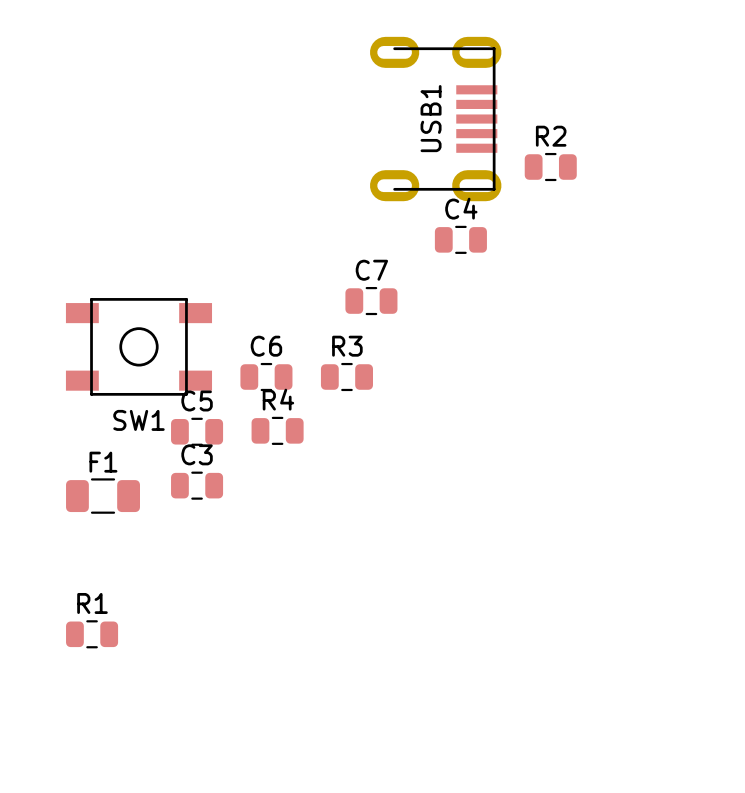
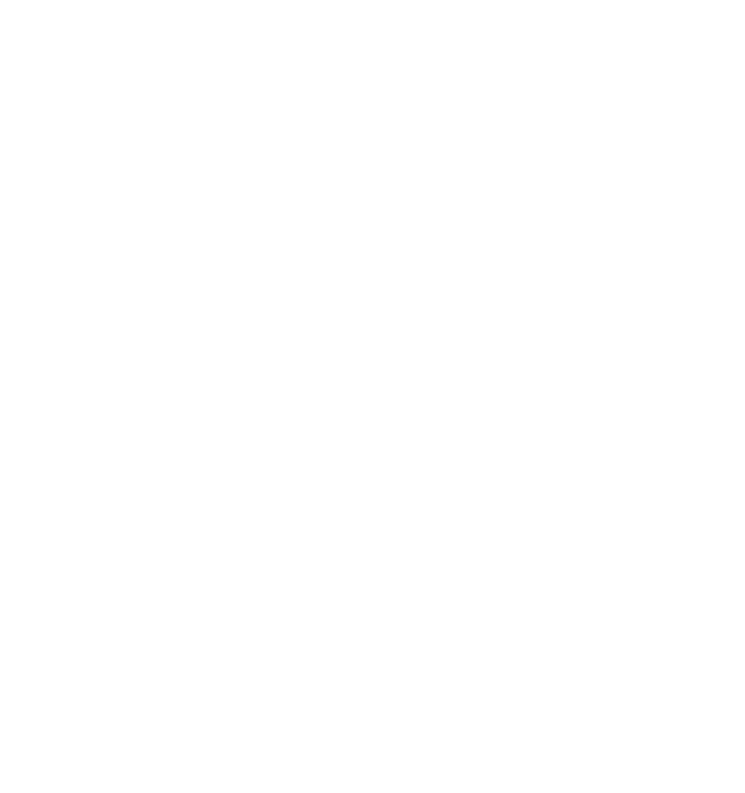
USB1: (435, 119) -> none
R2: (550, 167) -> none
C4: (460, 239) -> none
C7: (371, 301) -> none
SW1: (138, 346) -> none
C6: (266, 377) -> none
R3: (346, 377) -> none
R4: (277, 430) -> none
C5: (197, 431) -> none
C3: (197, 485) -> none
F1: (103, 496) -> none
R1: (92, 634) -> none

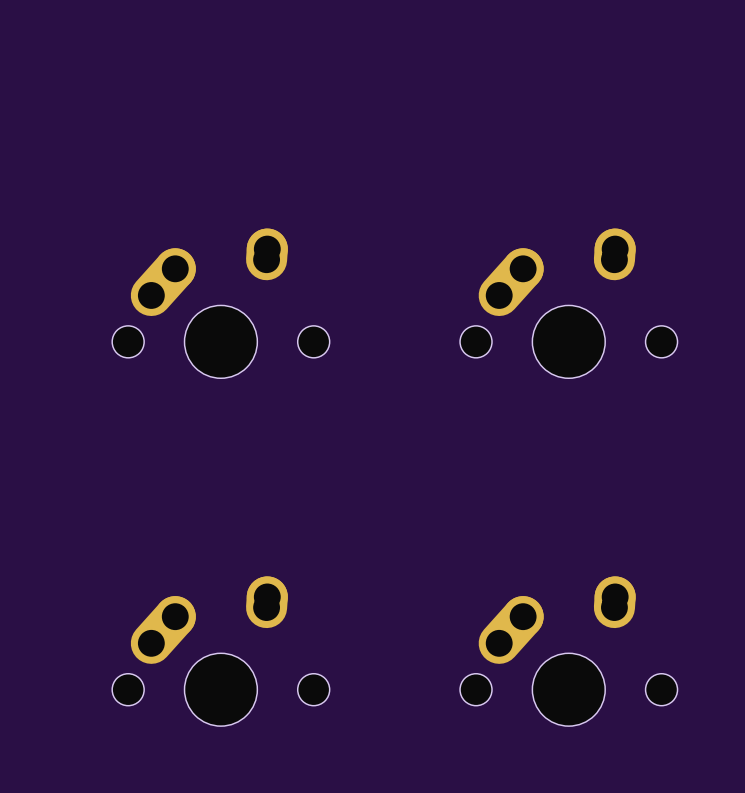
part: none -> (220, 303)
part: none -> (568, 303)
part: none -> (220, 651)
part: none -> (568, 651)

